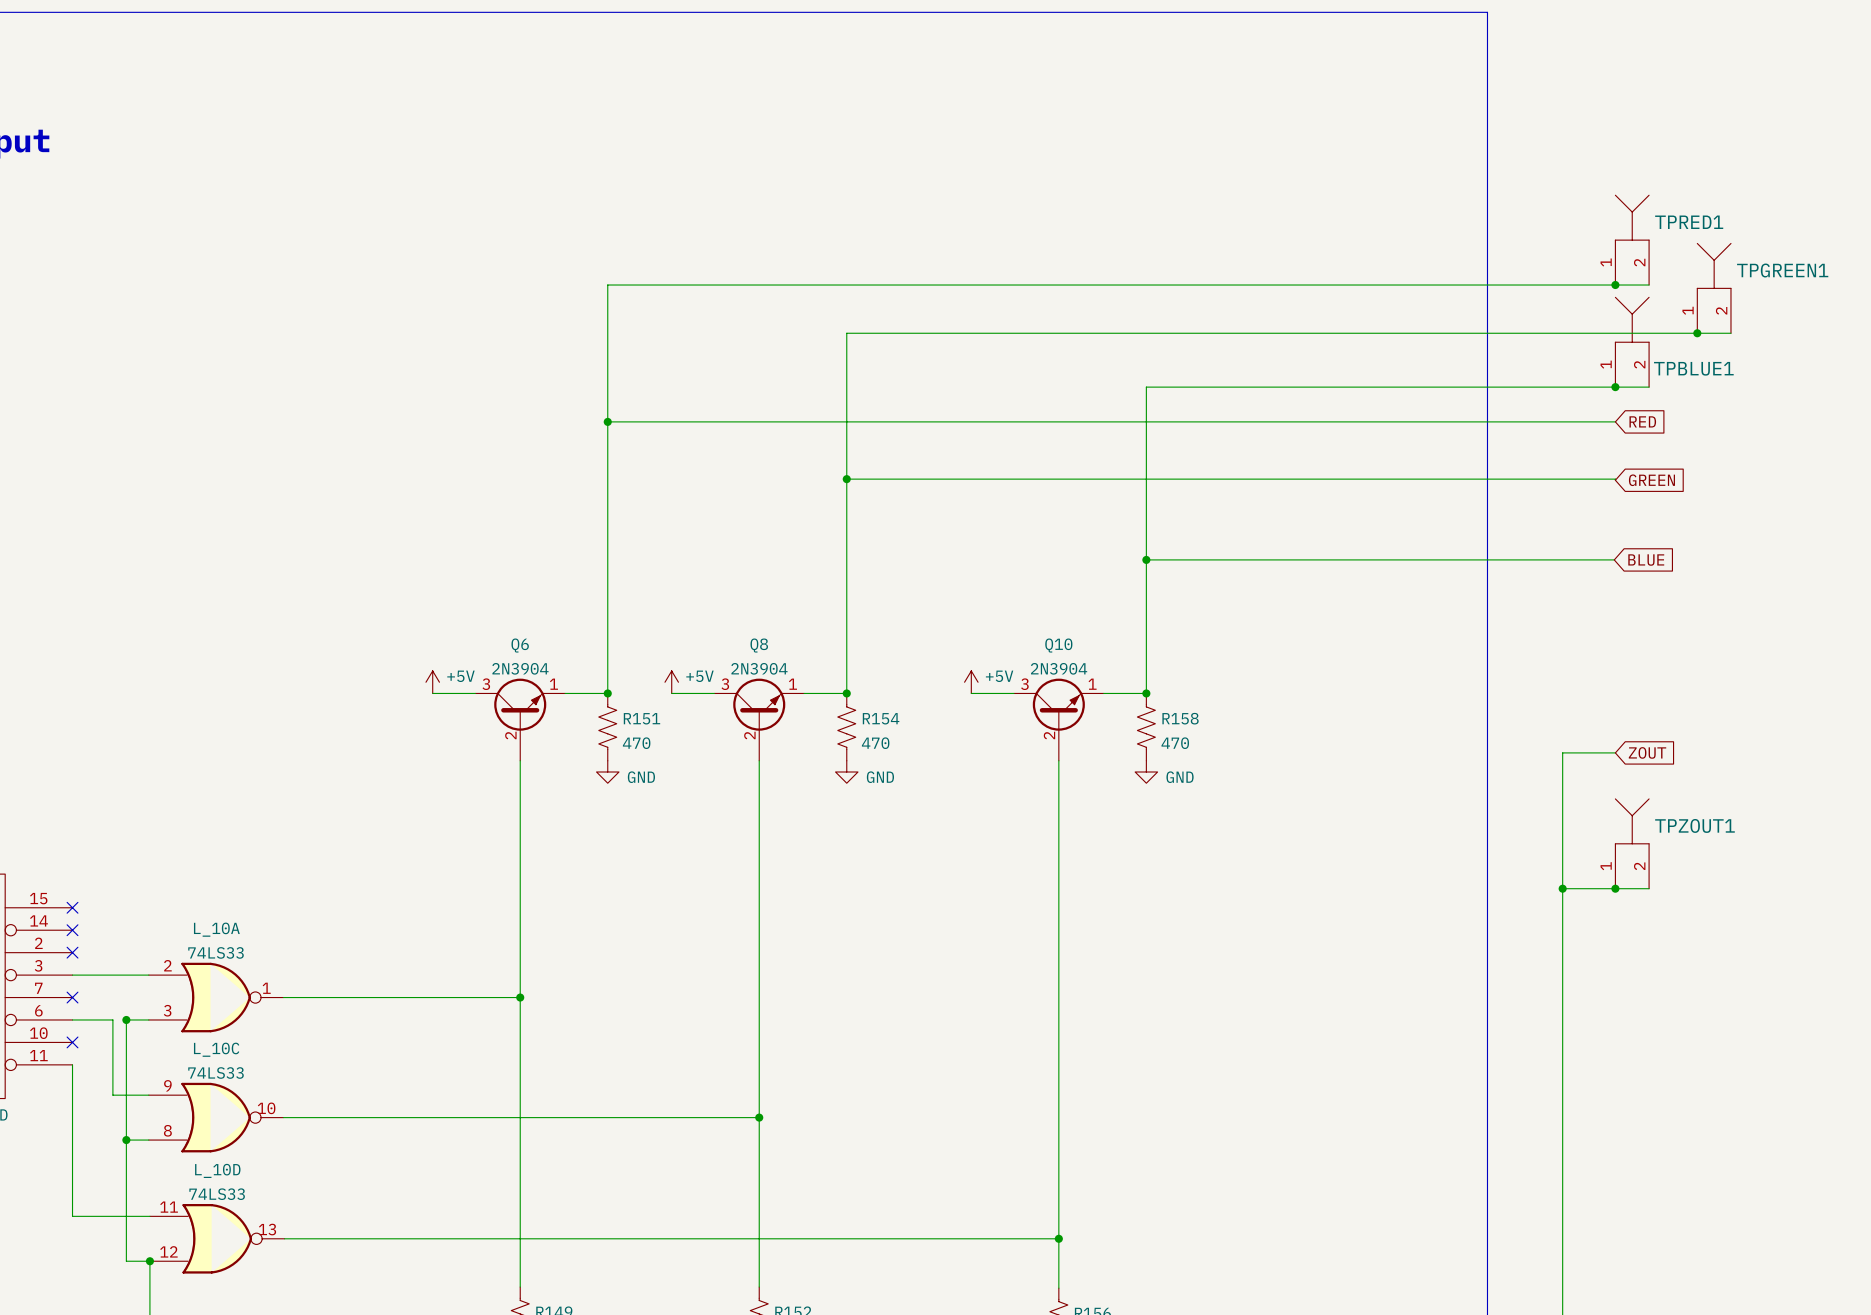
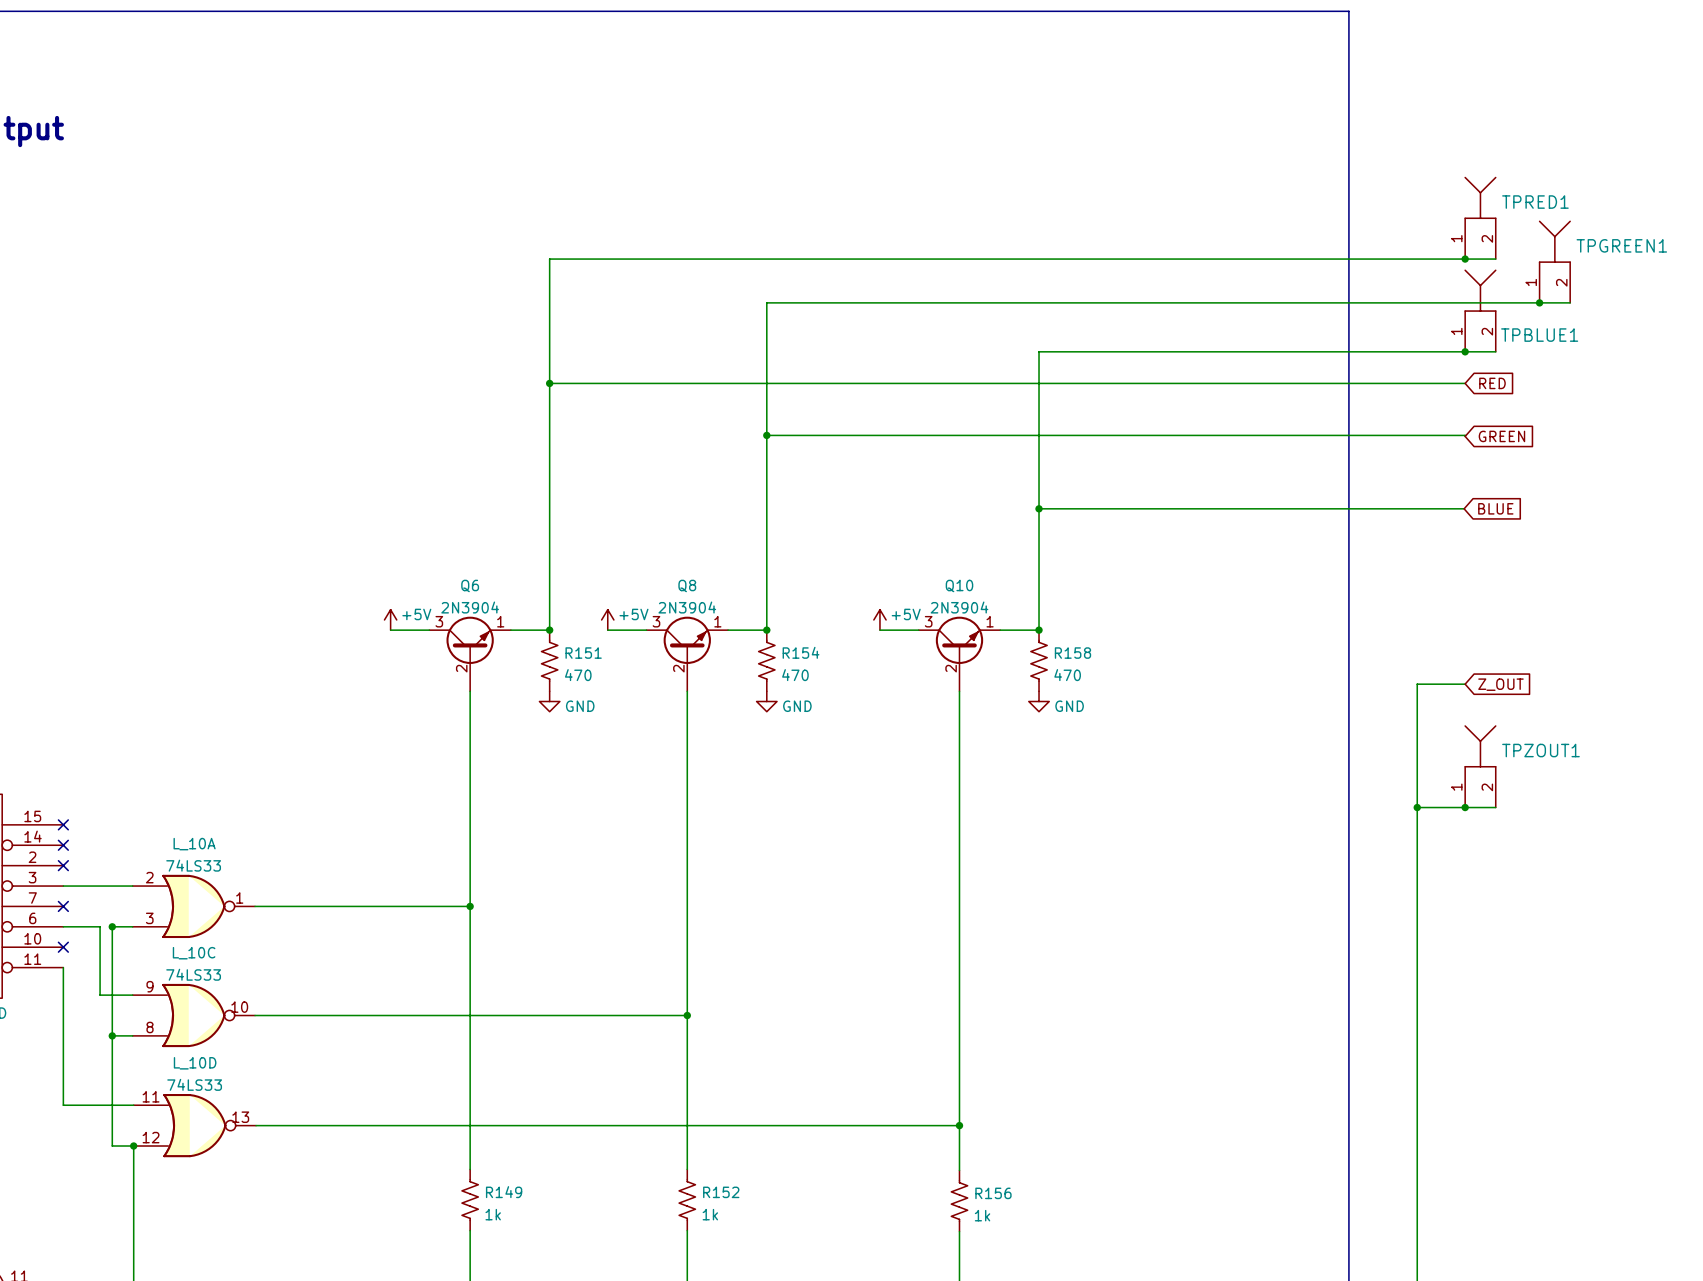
global label: ZOUT (1647, 752) -> Z_OUT (1500, 684)

